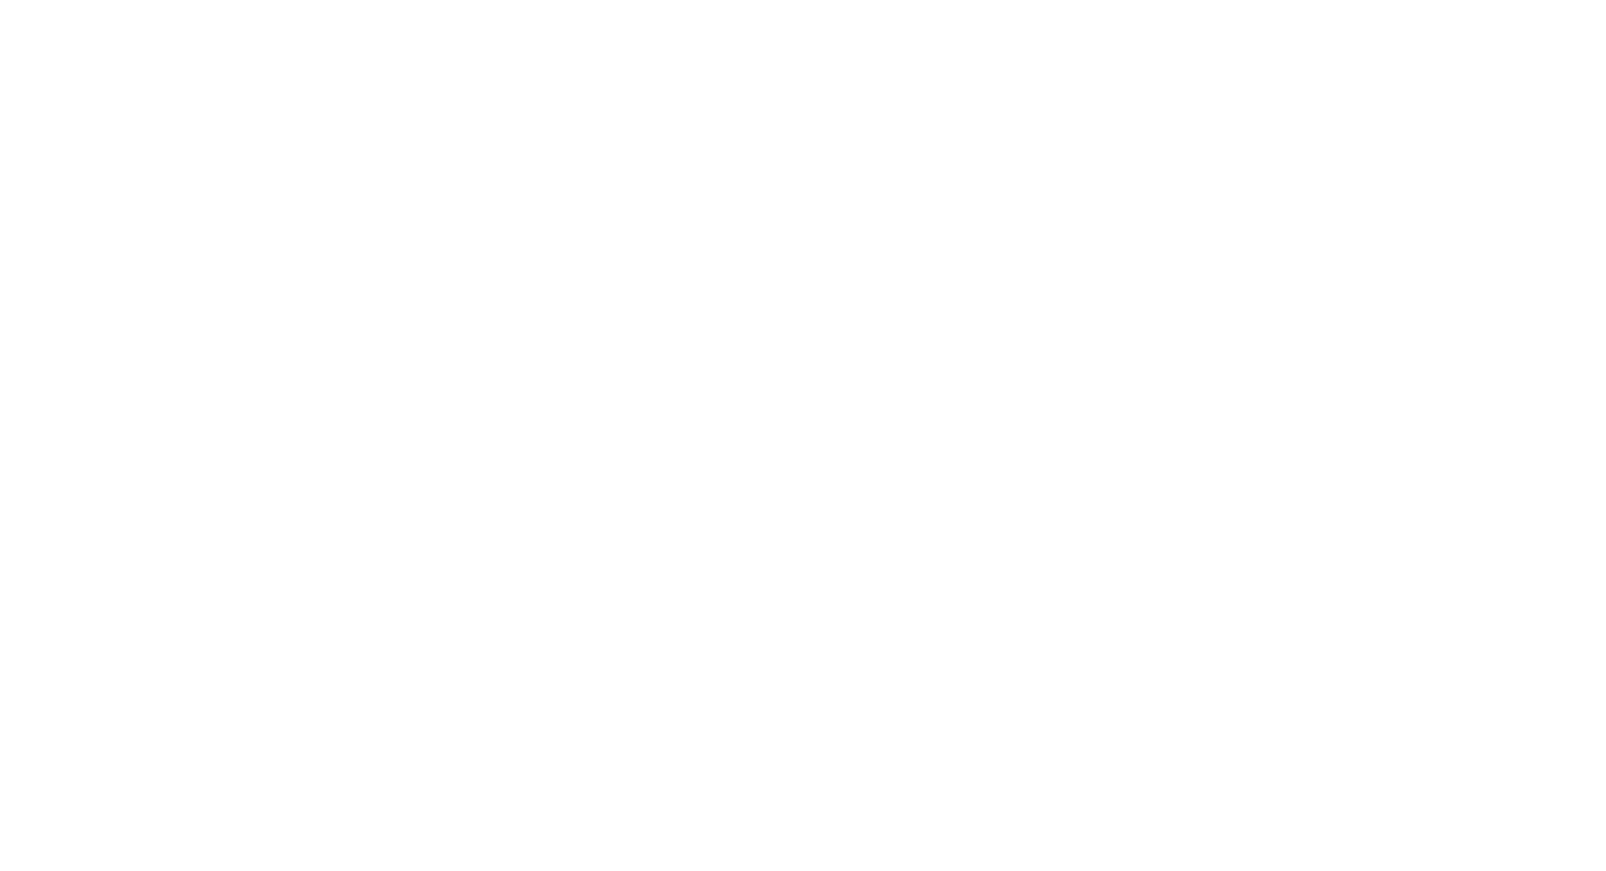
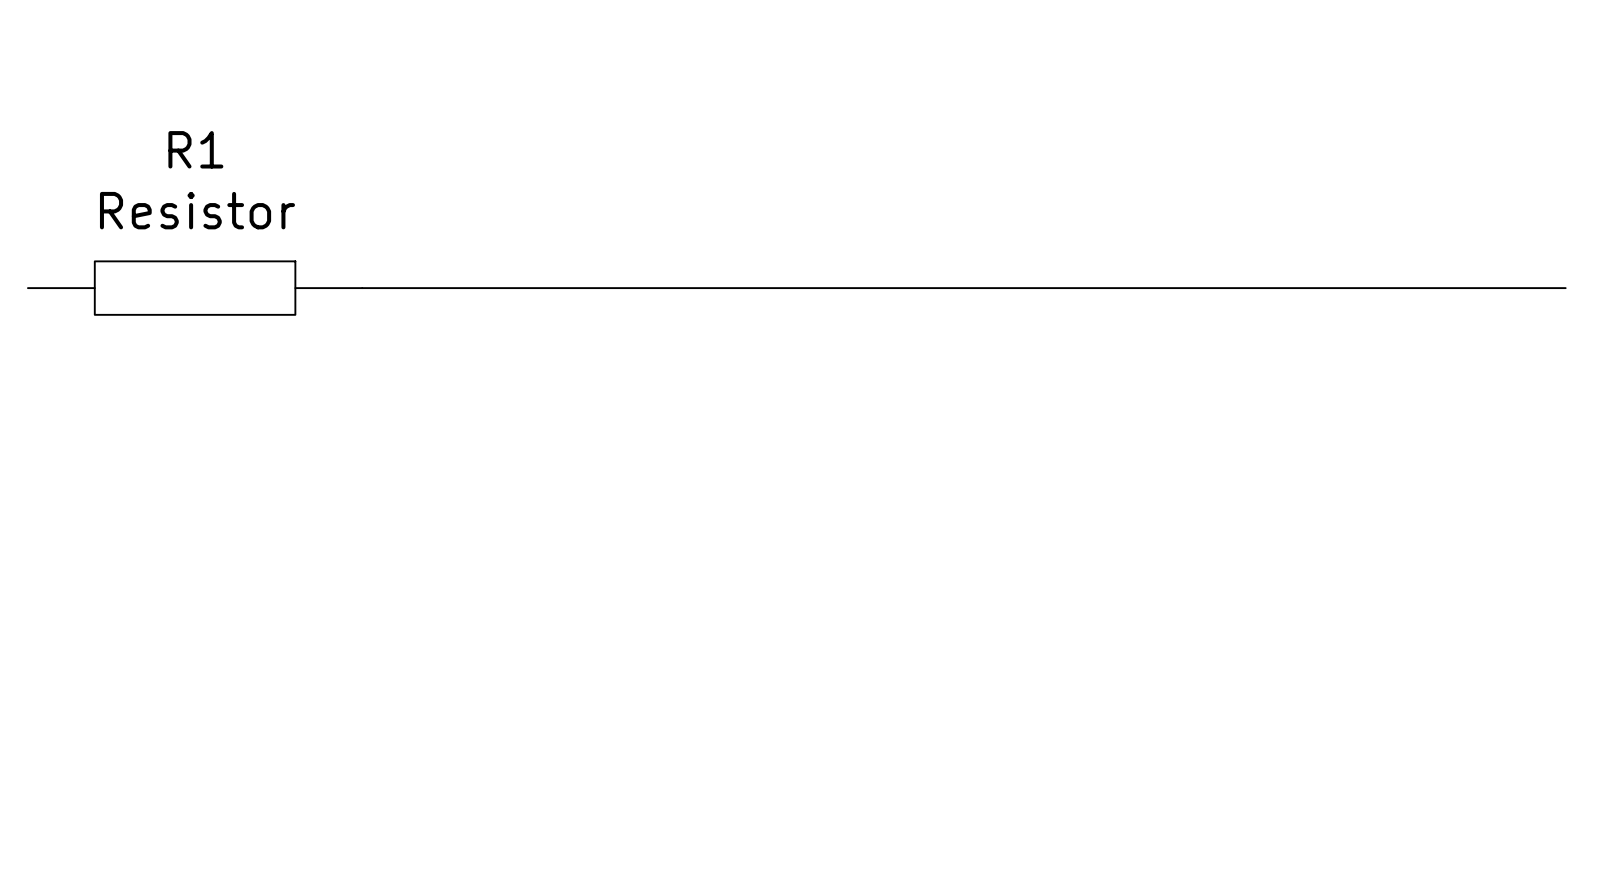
R1: none -> Resistor (195, 288)
wire: none -> (362, 288) (1565, 288)

